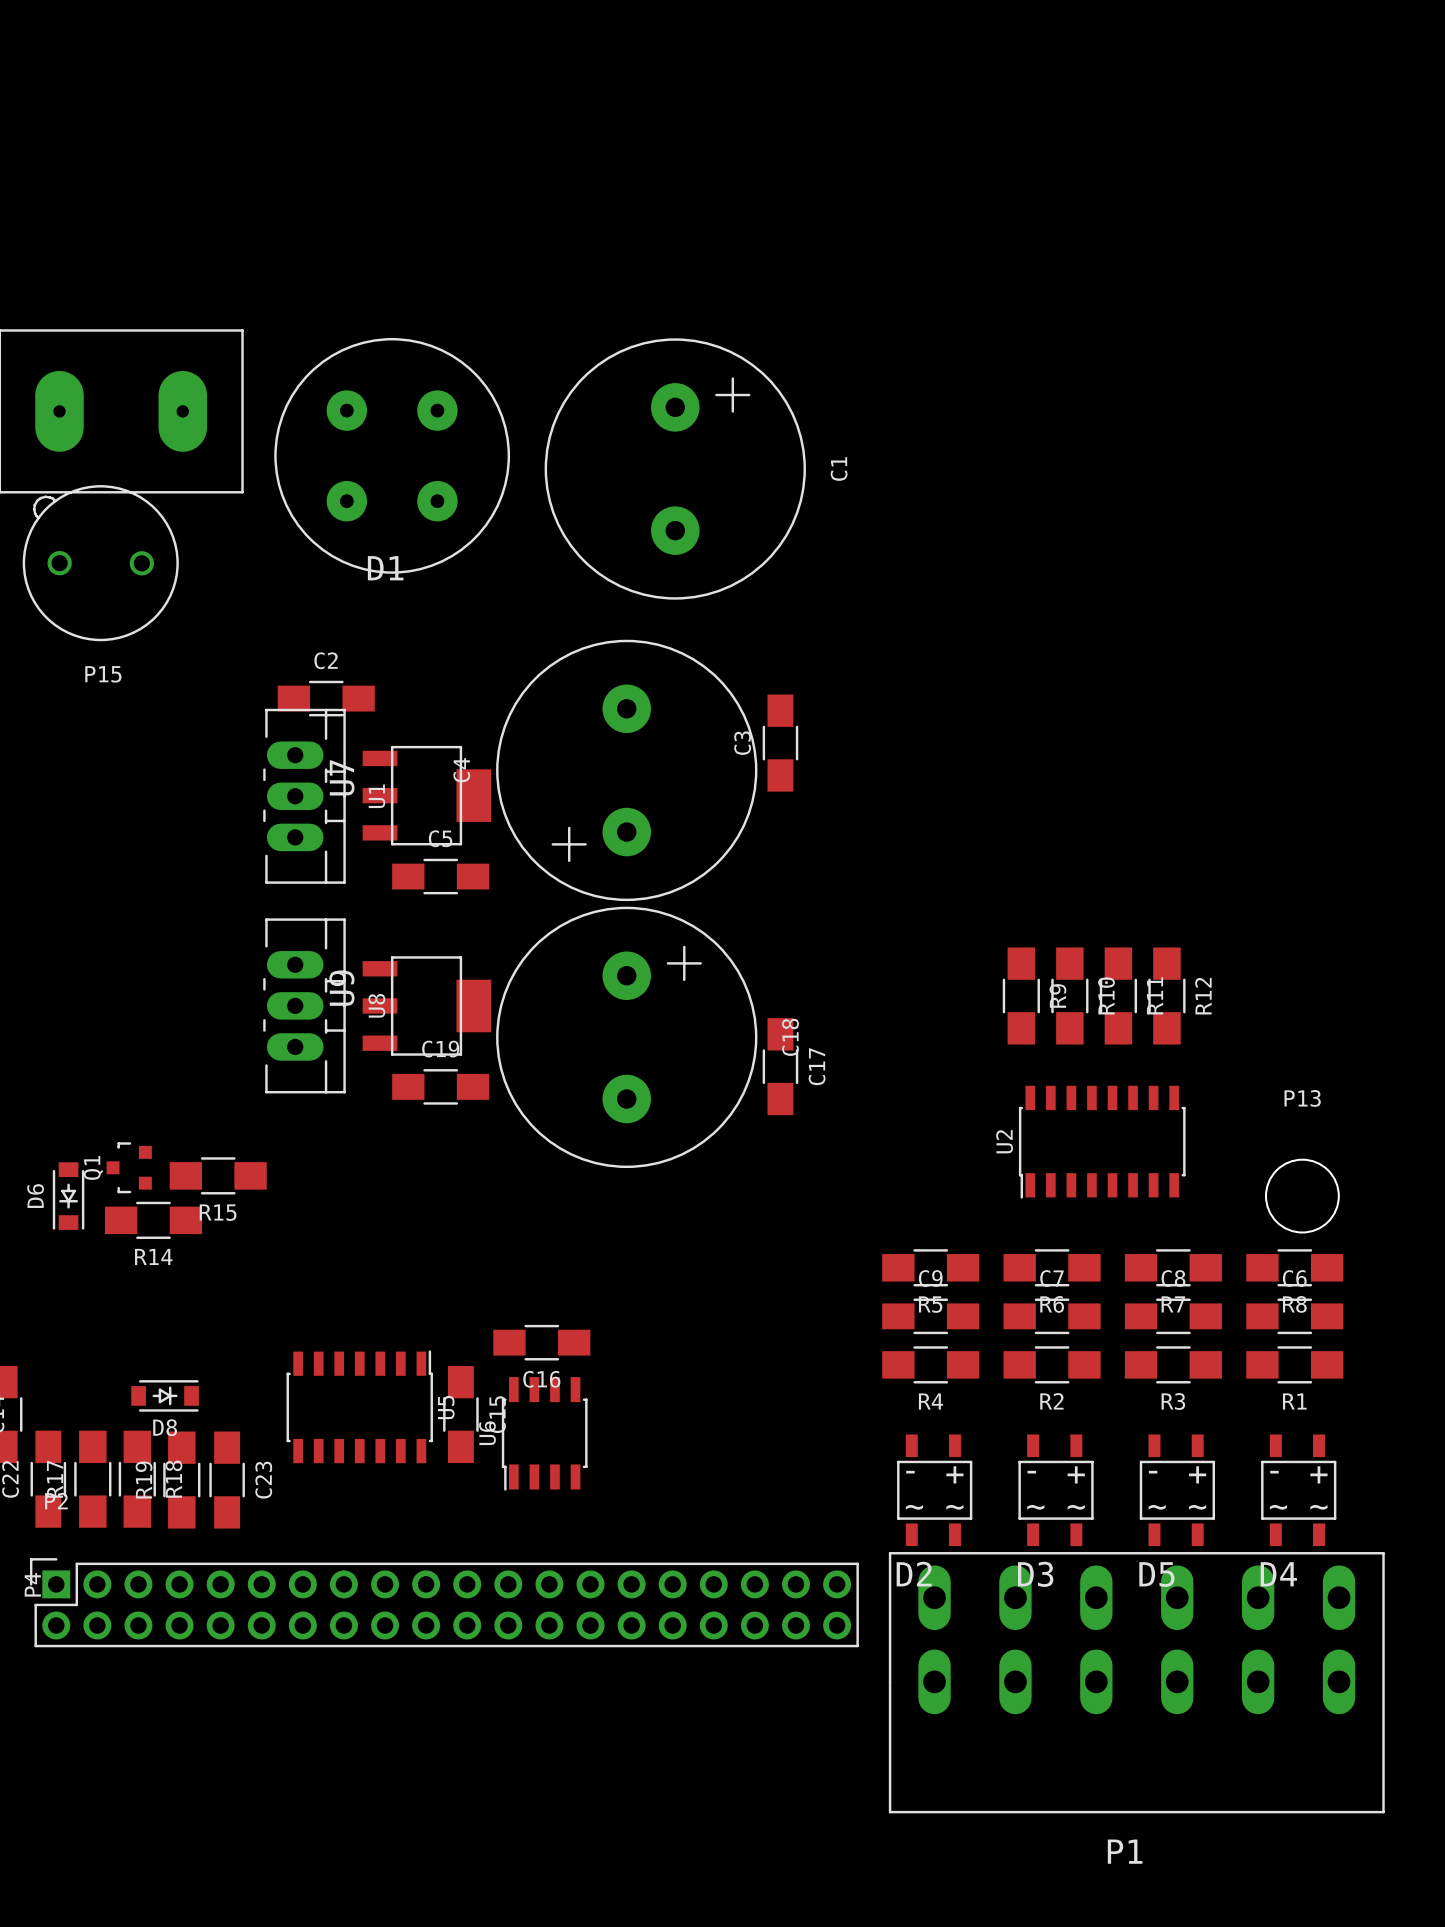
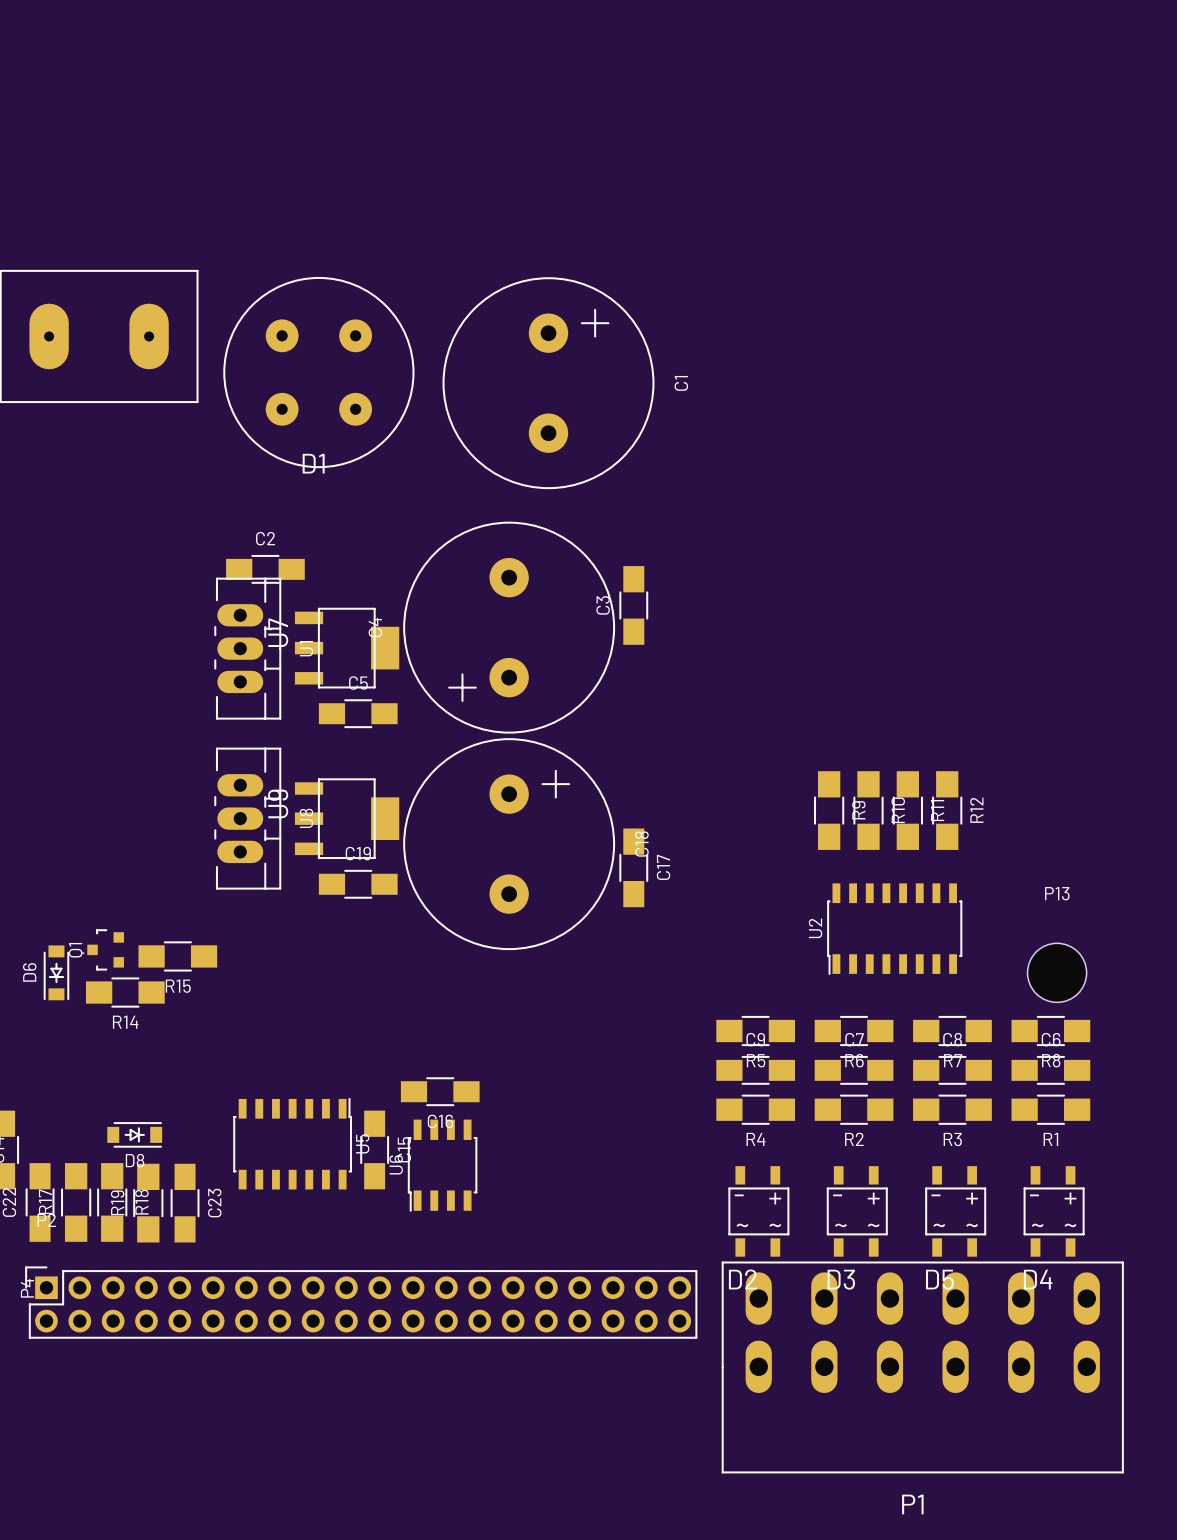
P15: (100, 563) -> none

